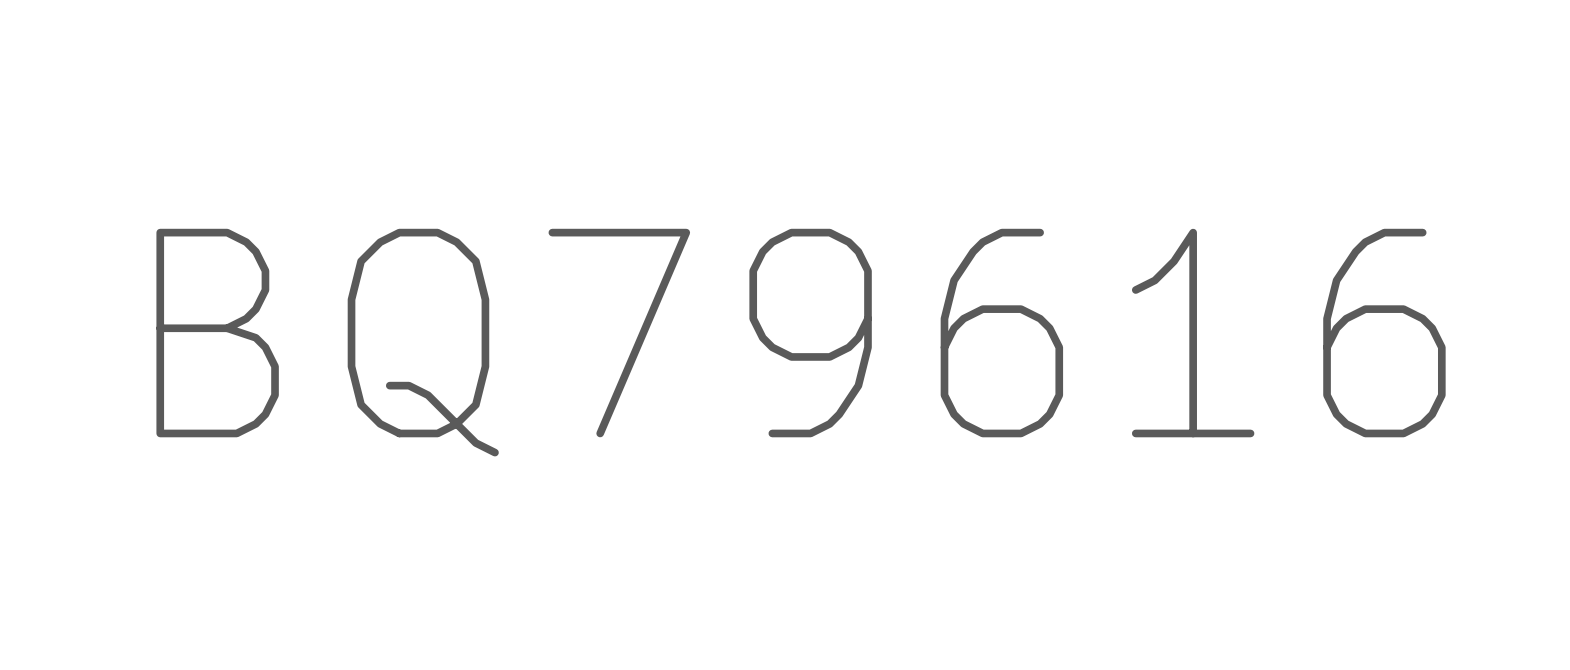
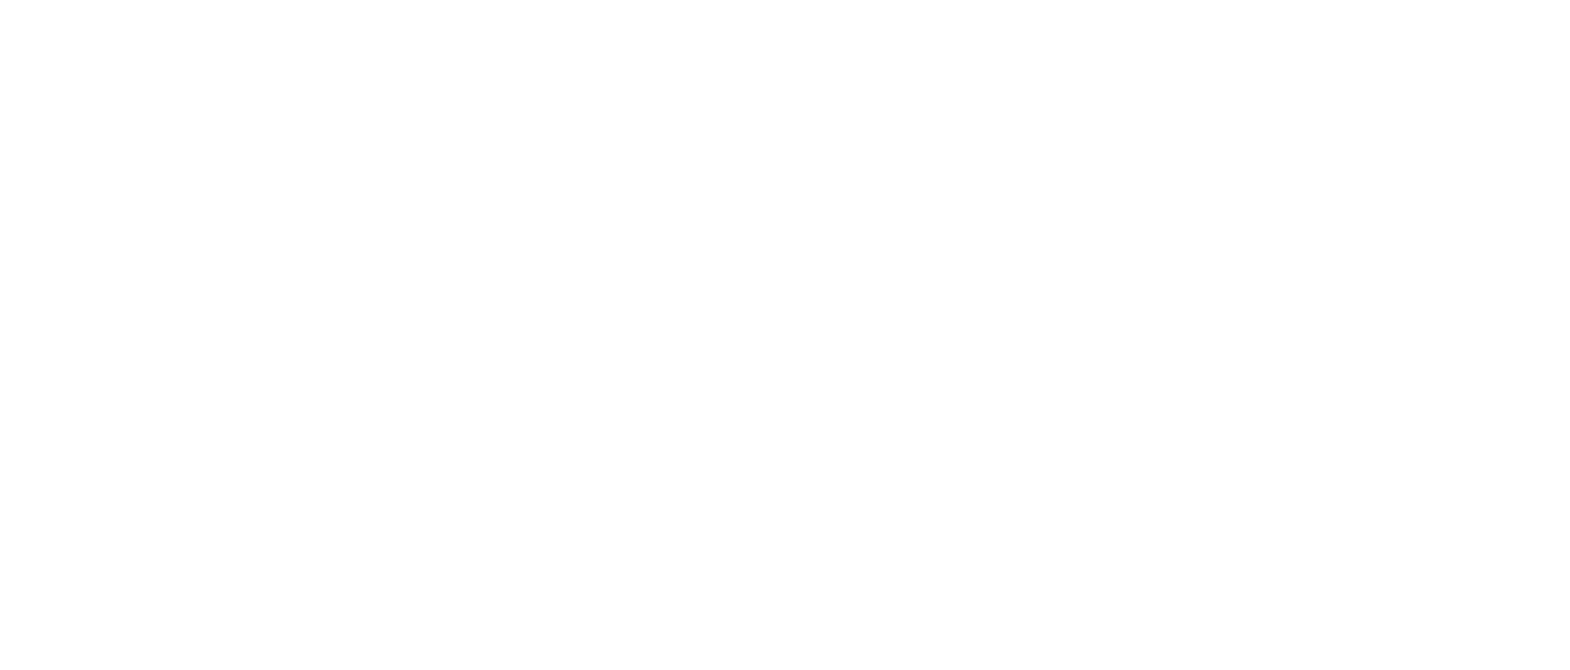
text: BQ79616 (801, 342) -> none

